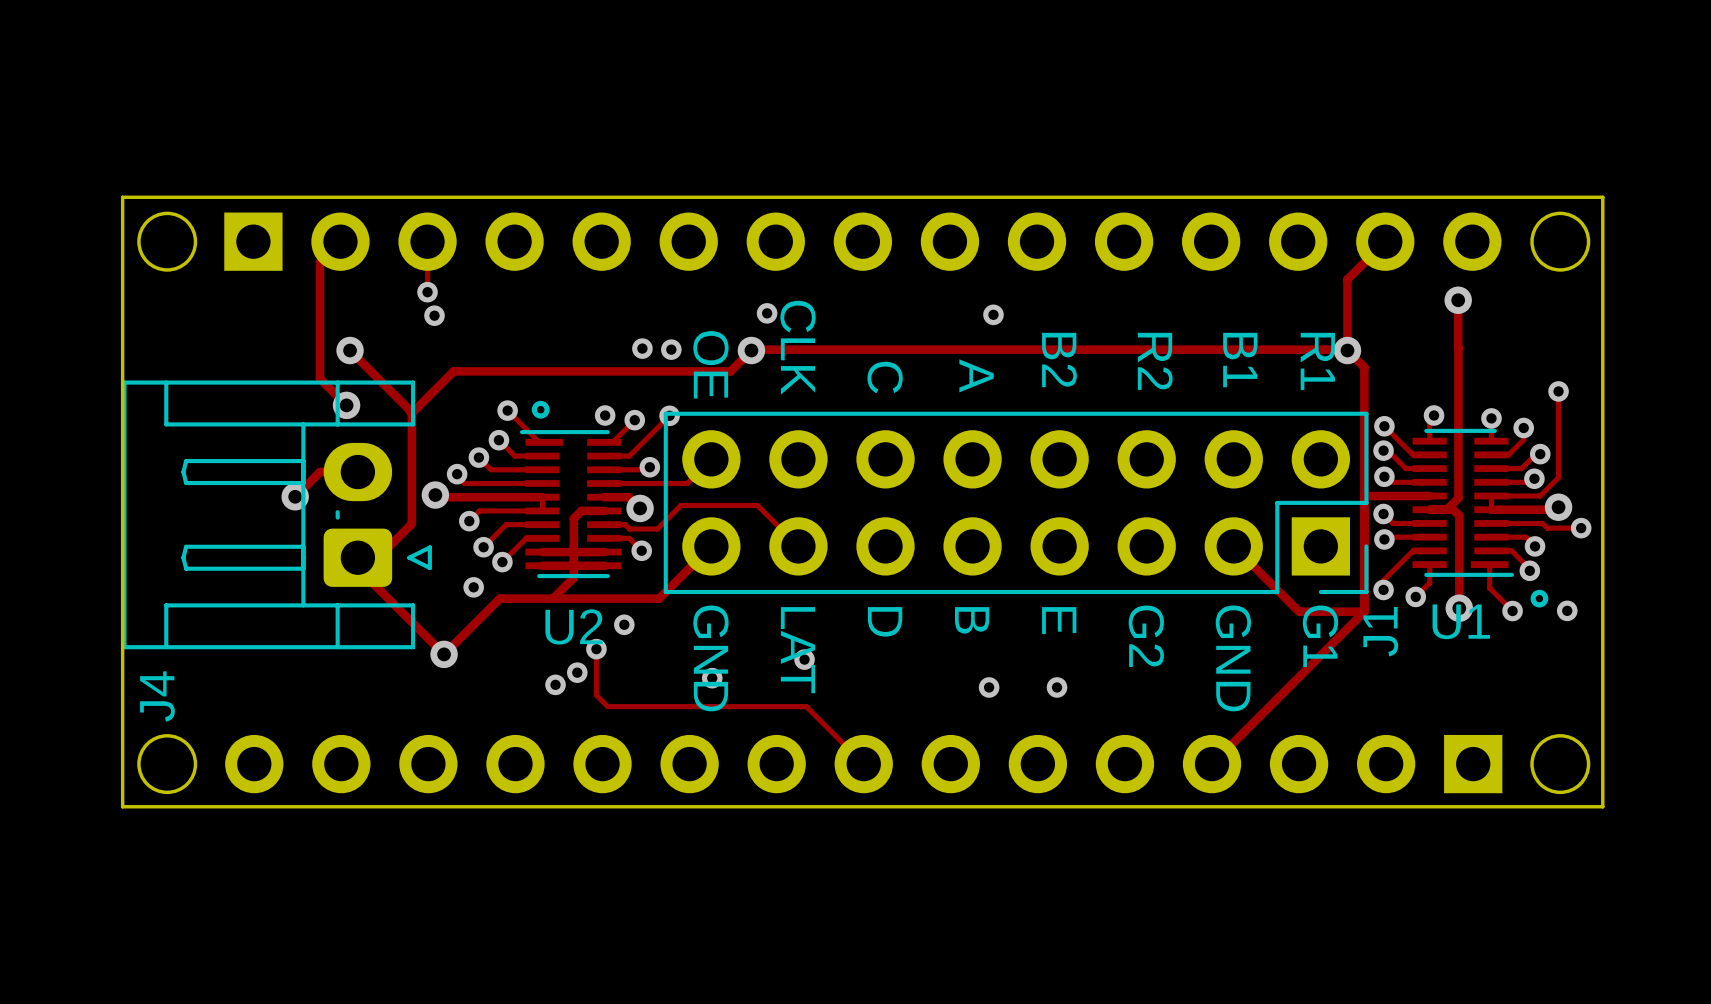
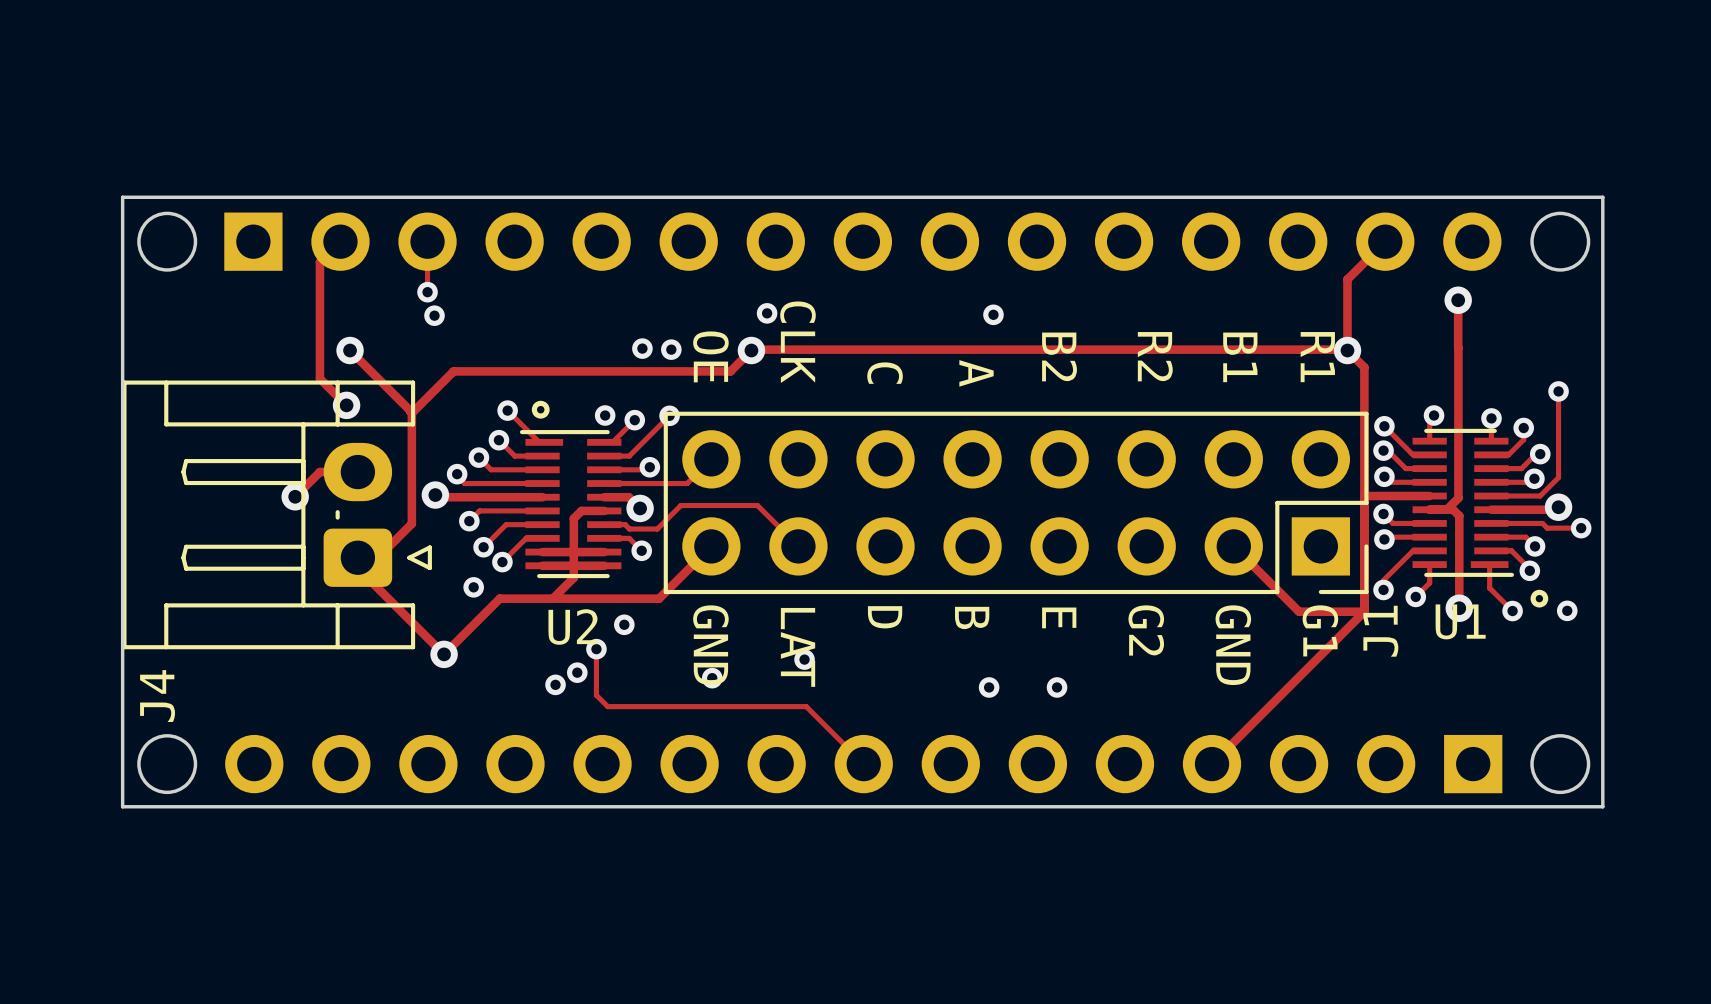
track: (1491, 496) (1491, 509) -> none
track: (542, 497) (542, 510) -> none

